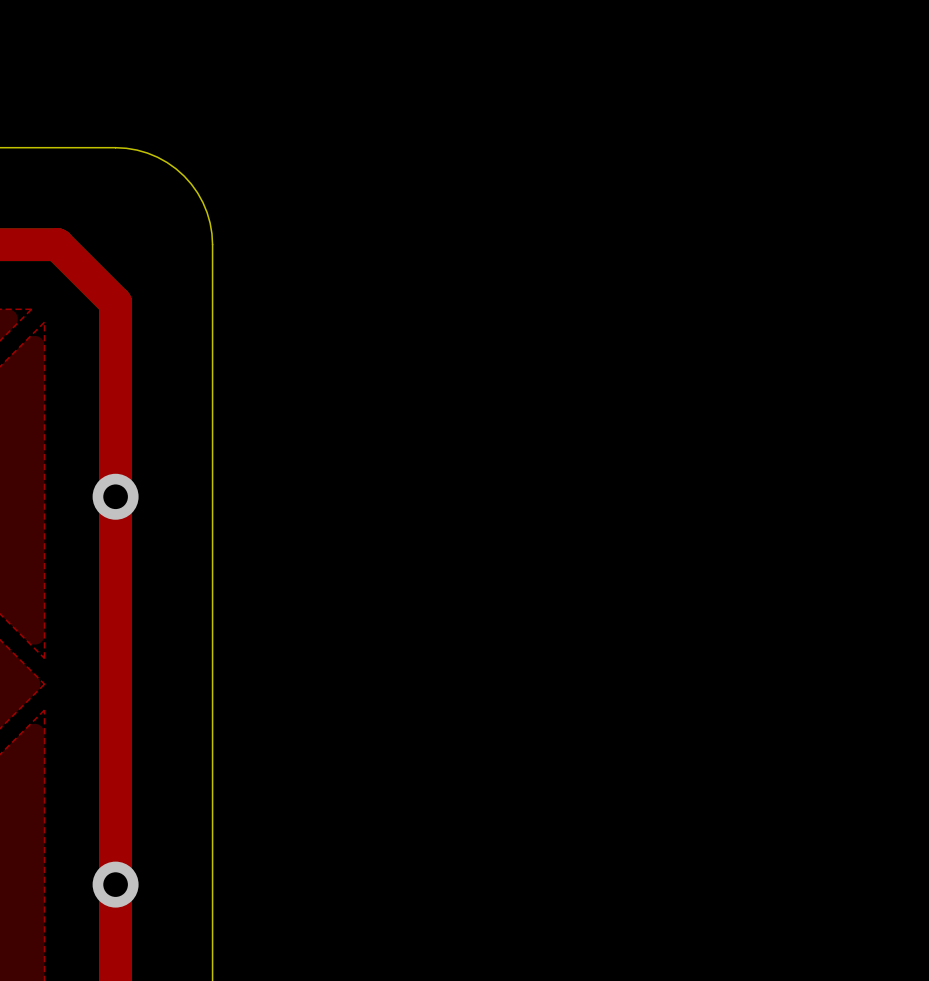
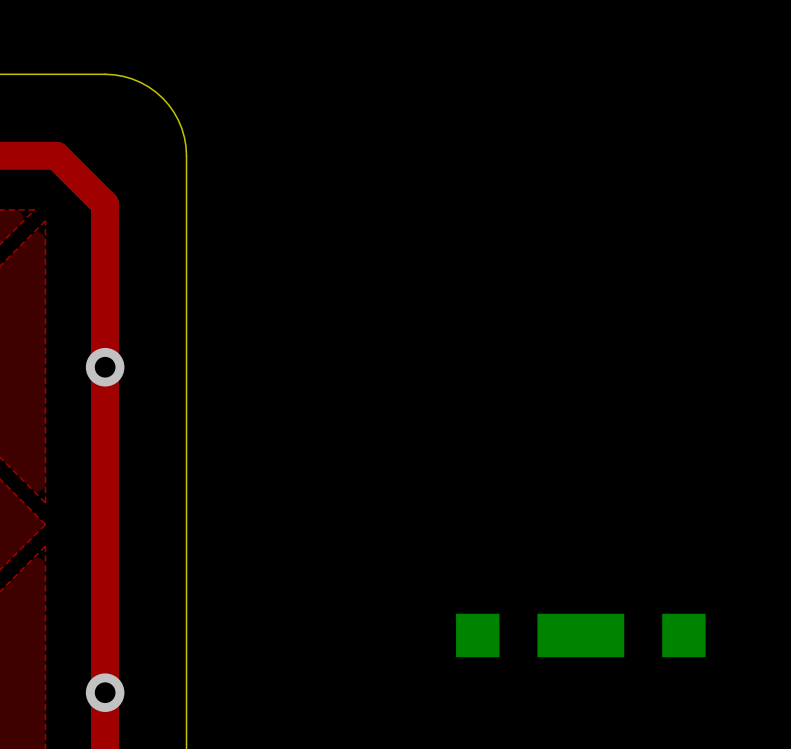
part: none -> (518, 635)
part: none -> (643, 635)

